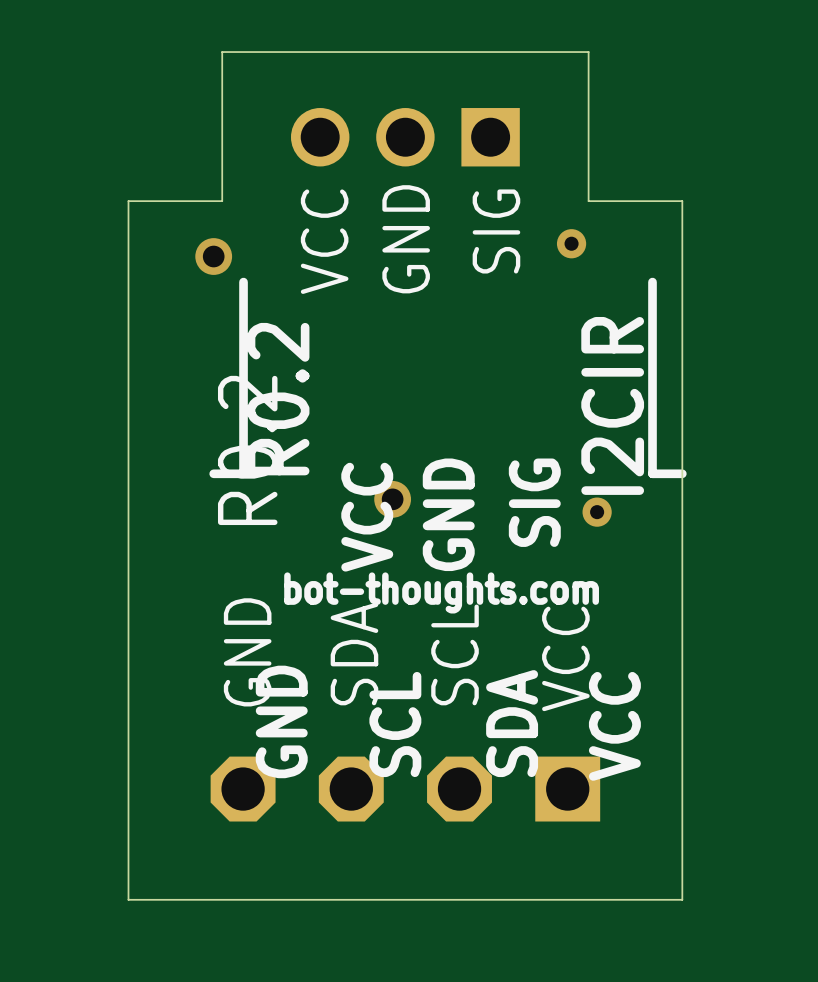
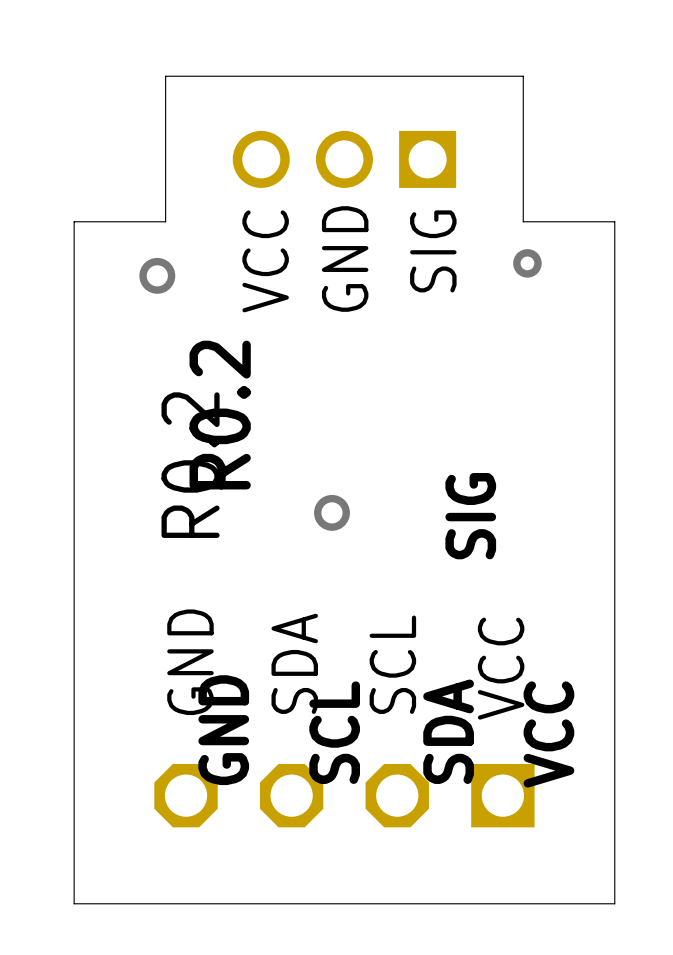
via position: (571, 243) -> (527, 263)
line: (243, 282) (243, 473) (213, 473) -> none
line: (652, 282) (652, 473) (682, 473) -> none
text: I2CIR (612, 405) -> none
via: (597, 512) -> none
text: GND (448, 514) -> none
text: VCC (367, 517) -> none
text: bot-thoughts.com (441, 592) -> none

